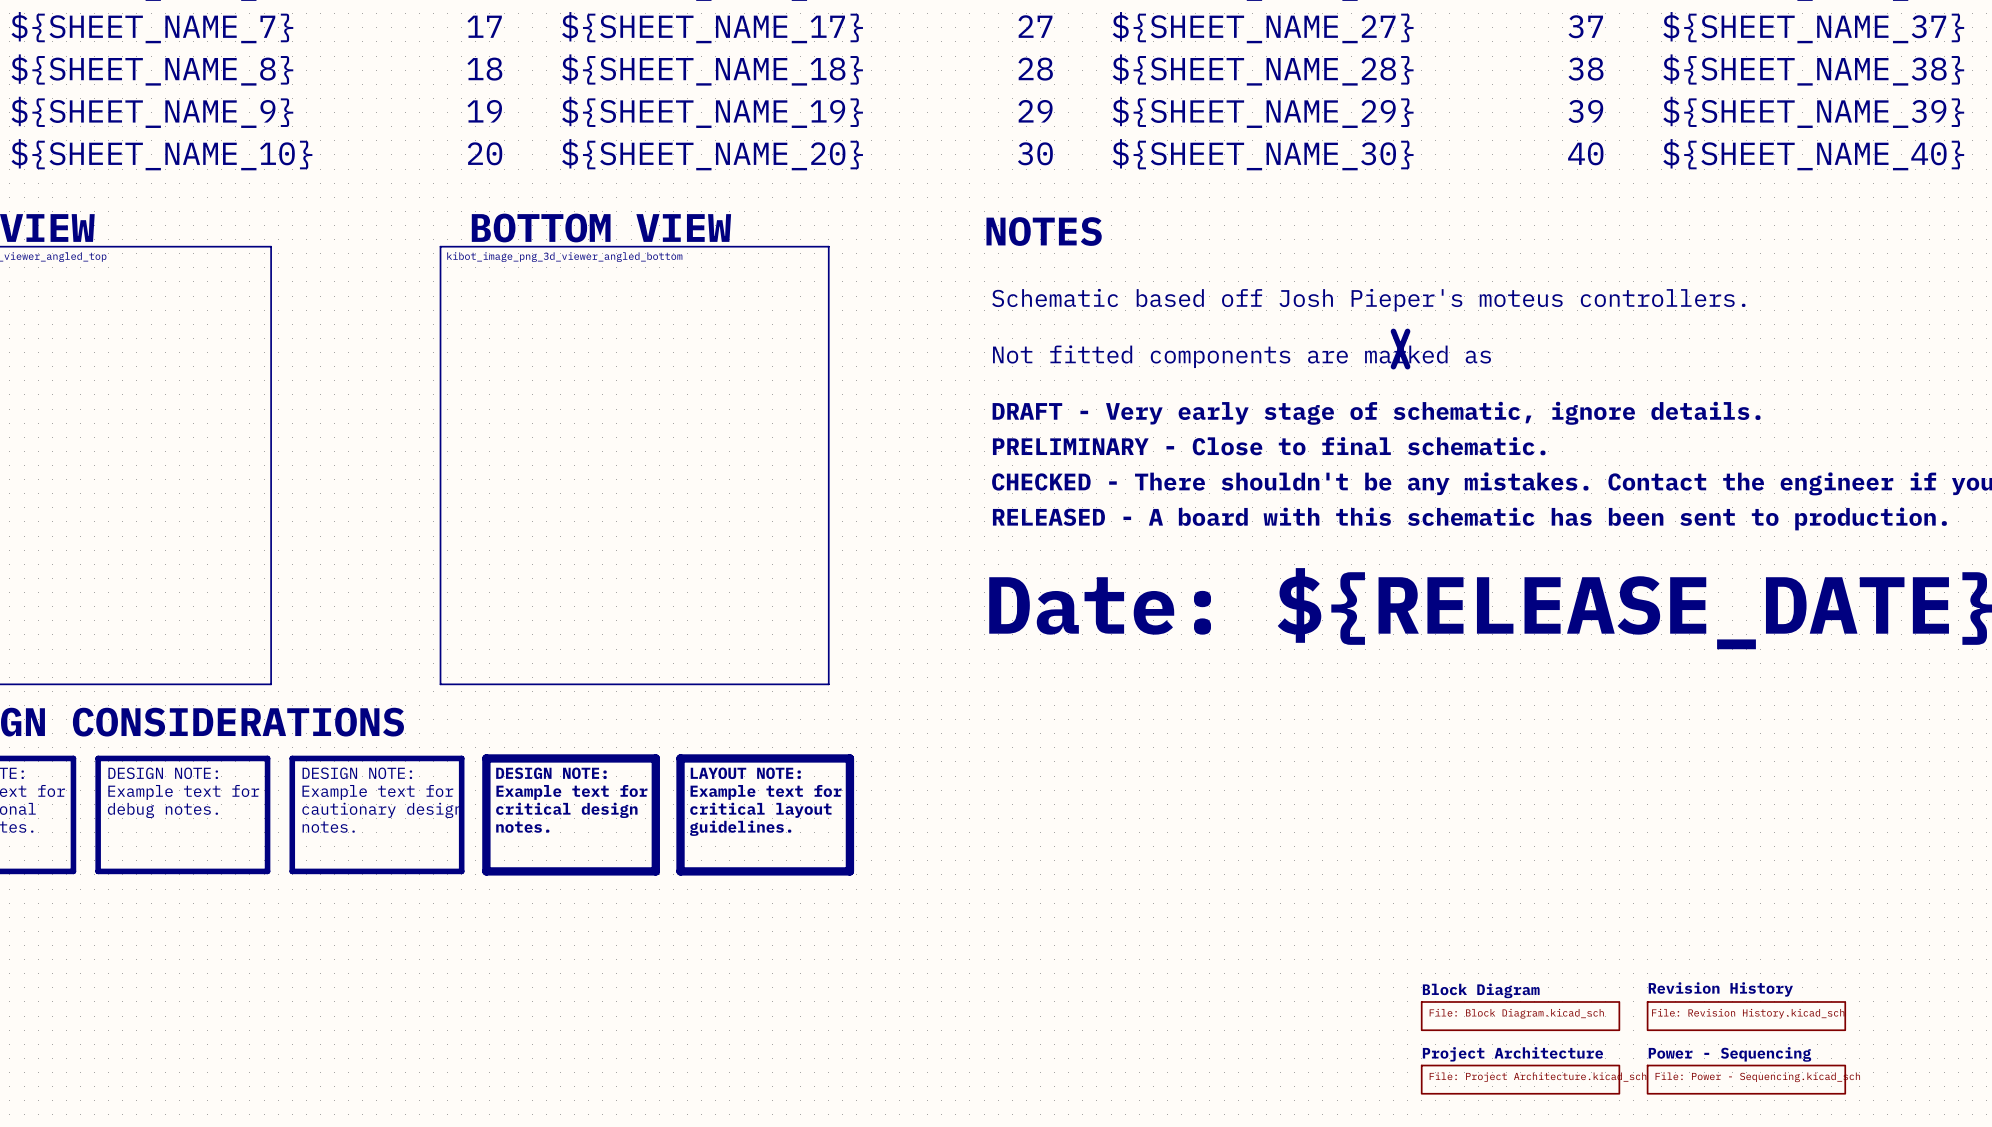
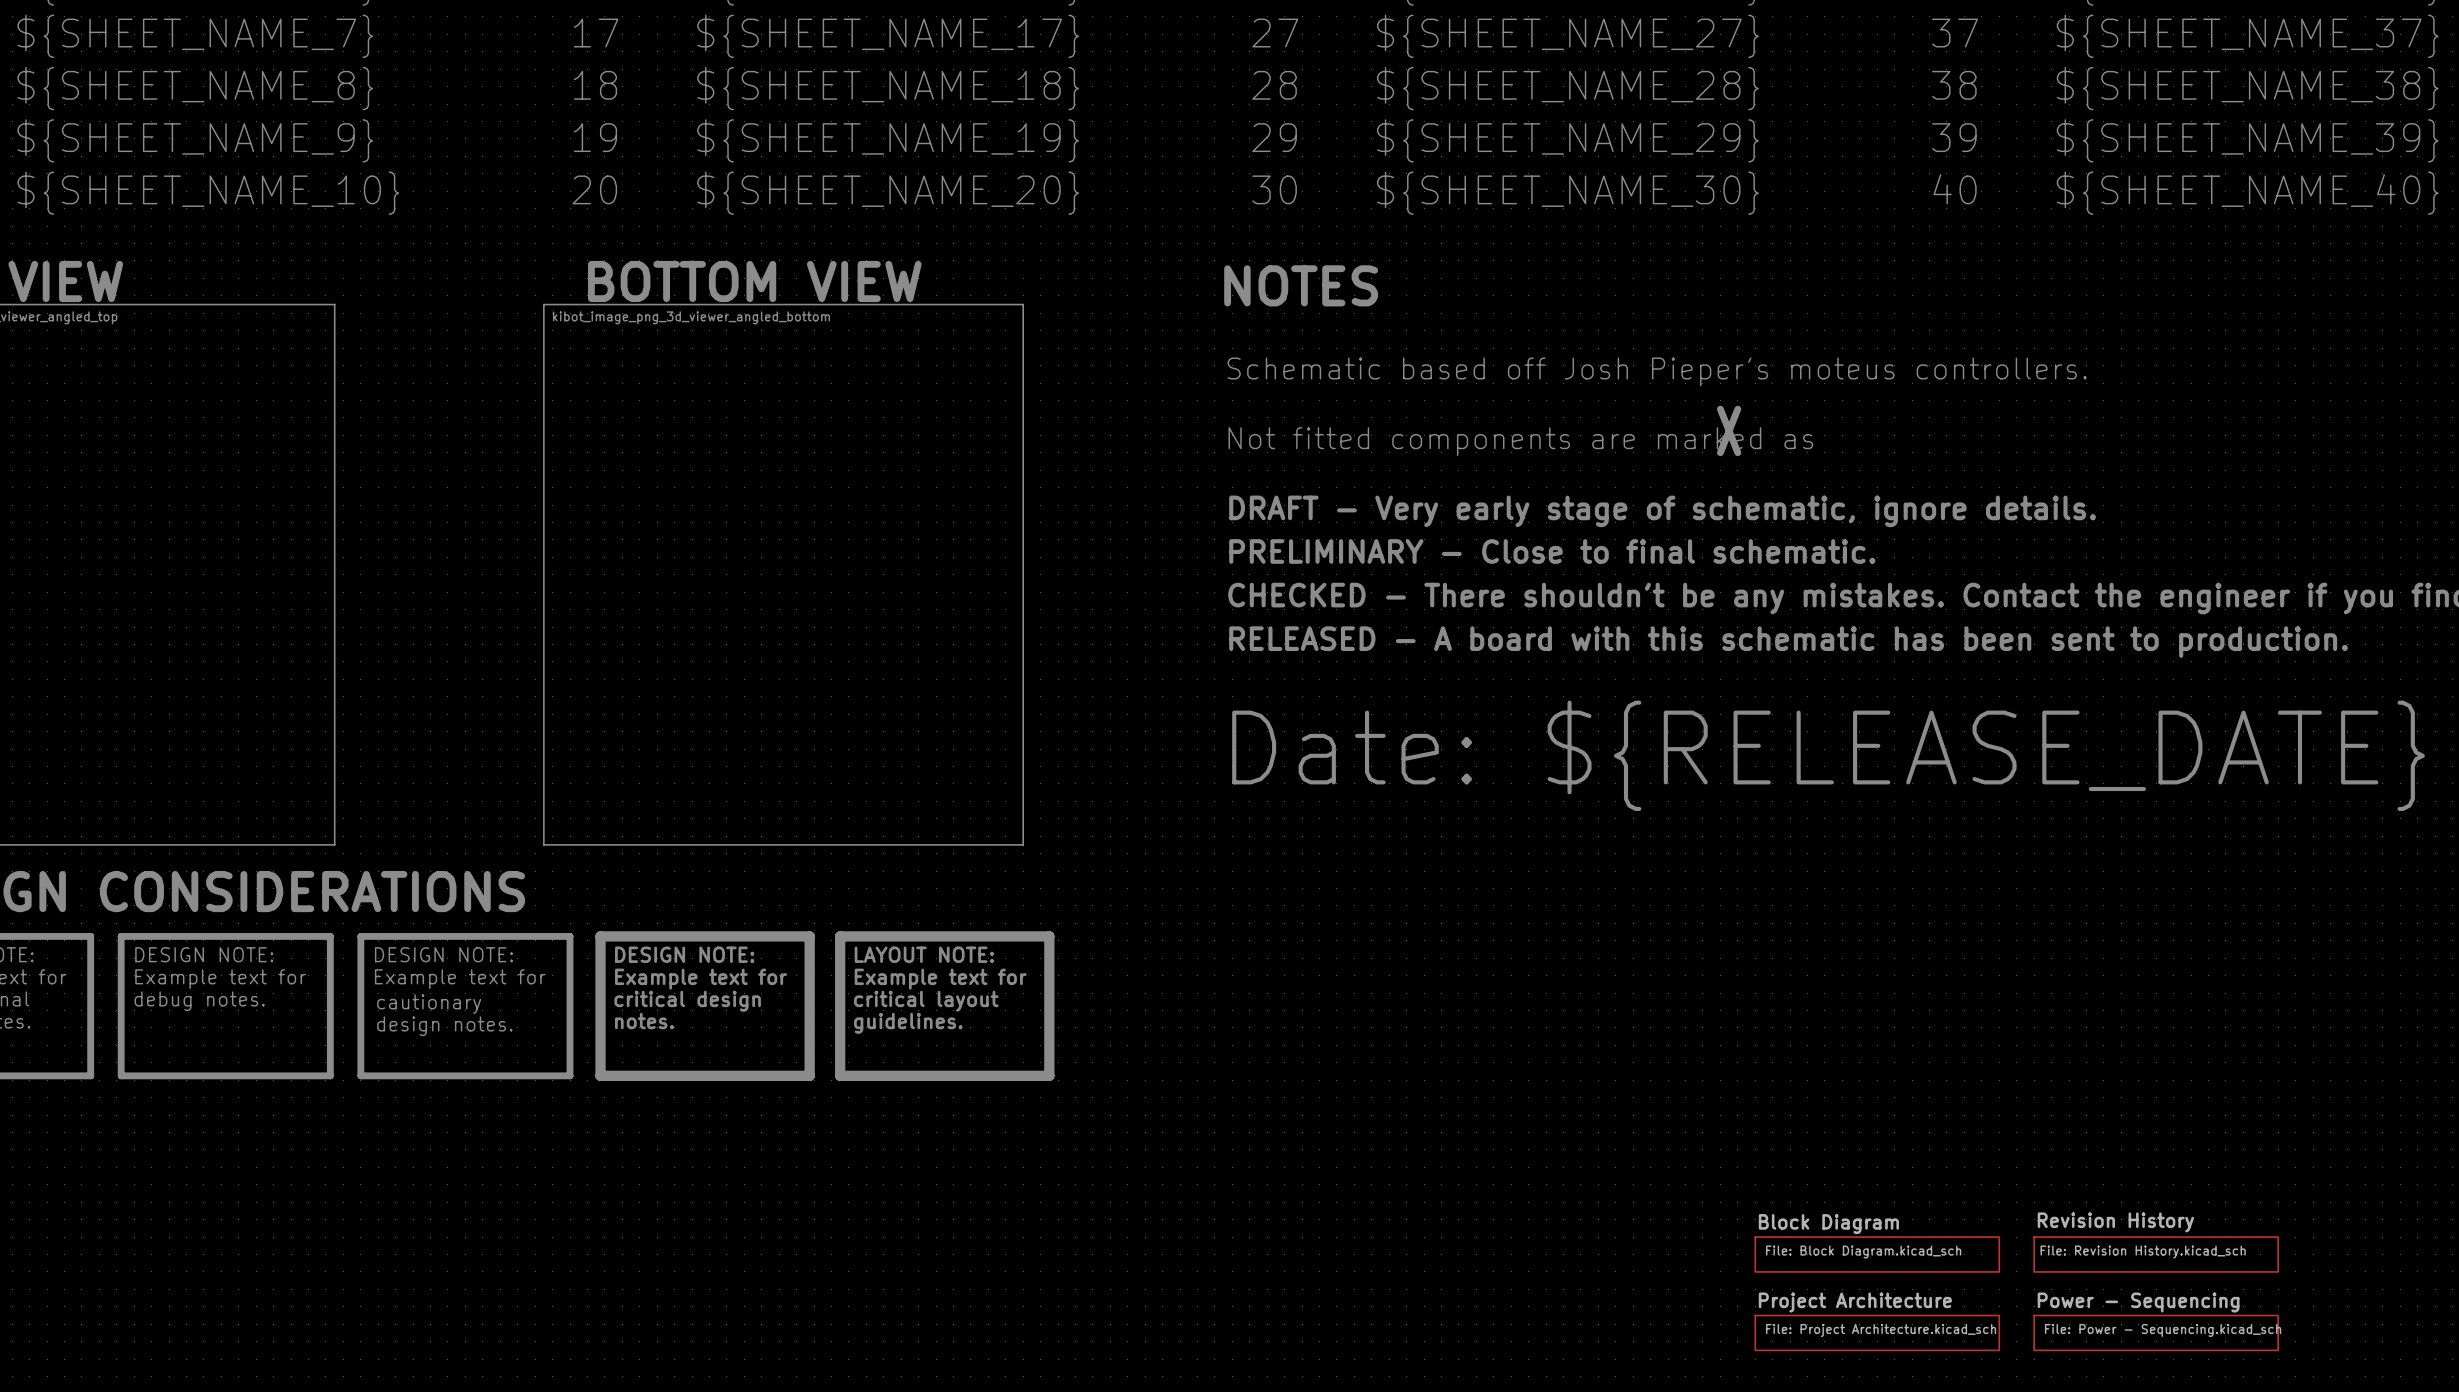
text: cautionary design (382, 810) -> cautionary (429, 1004)
text: notes. (328, 827) -> design notes. (444, 1026)

